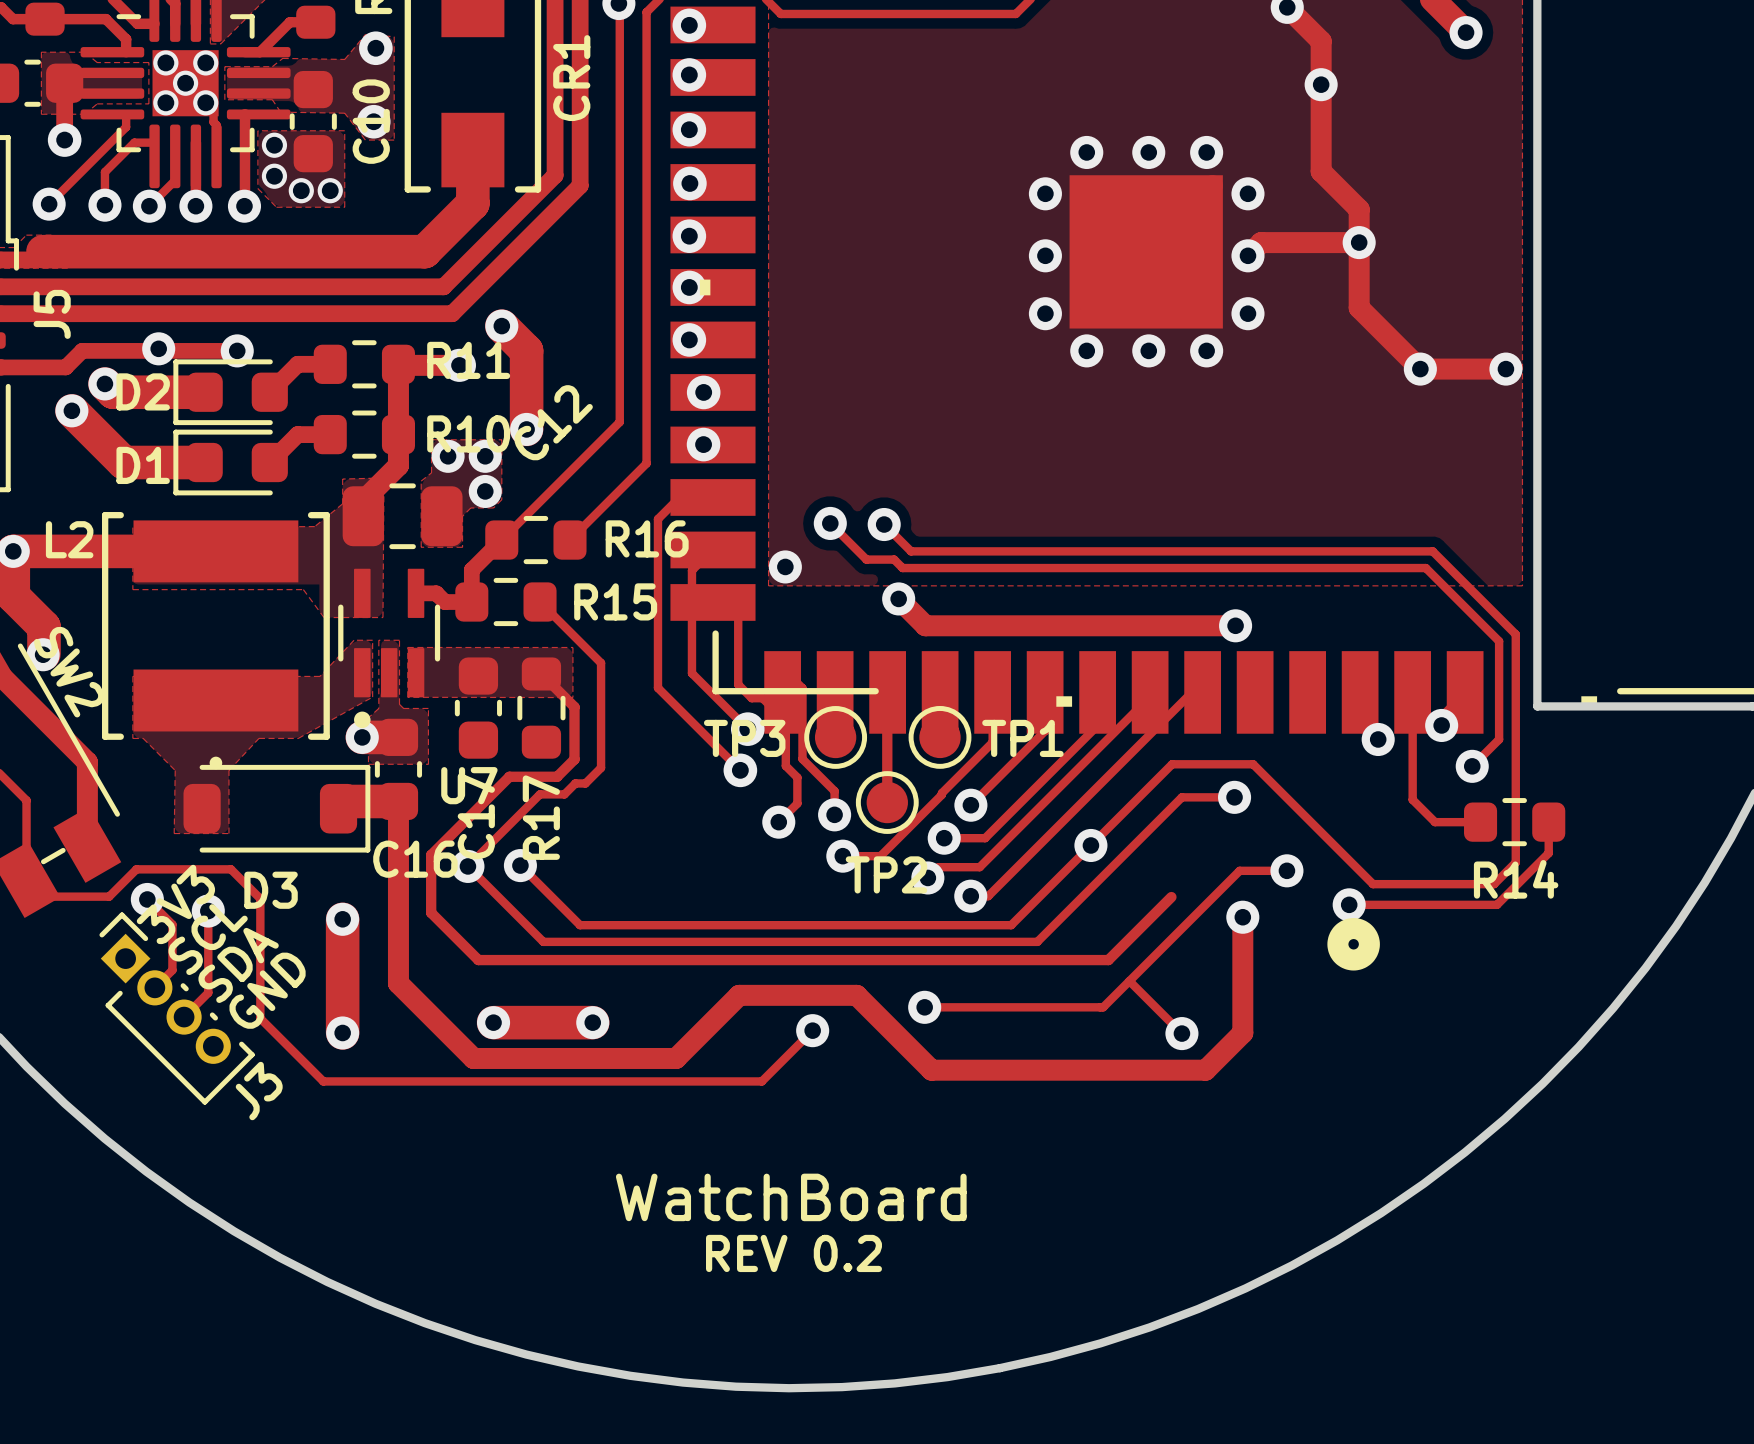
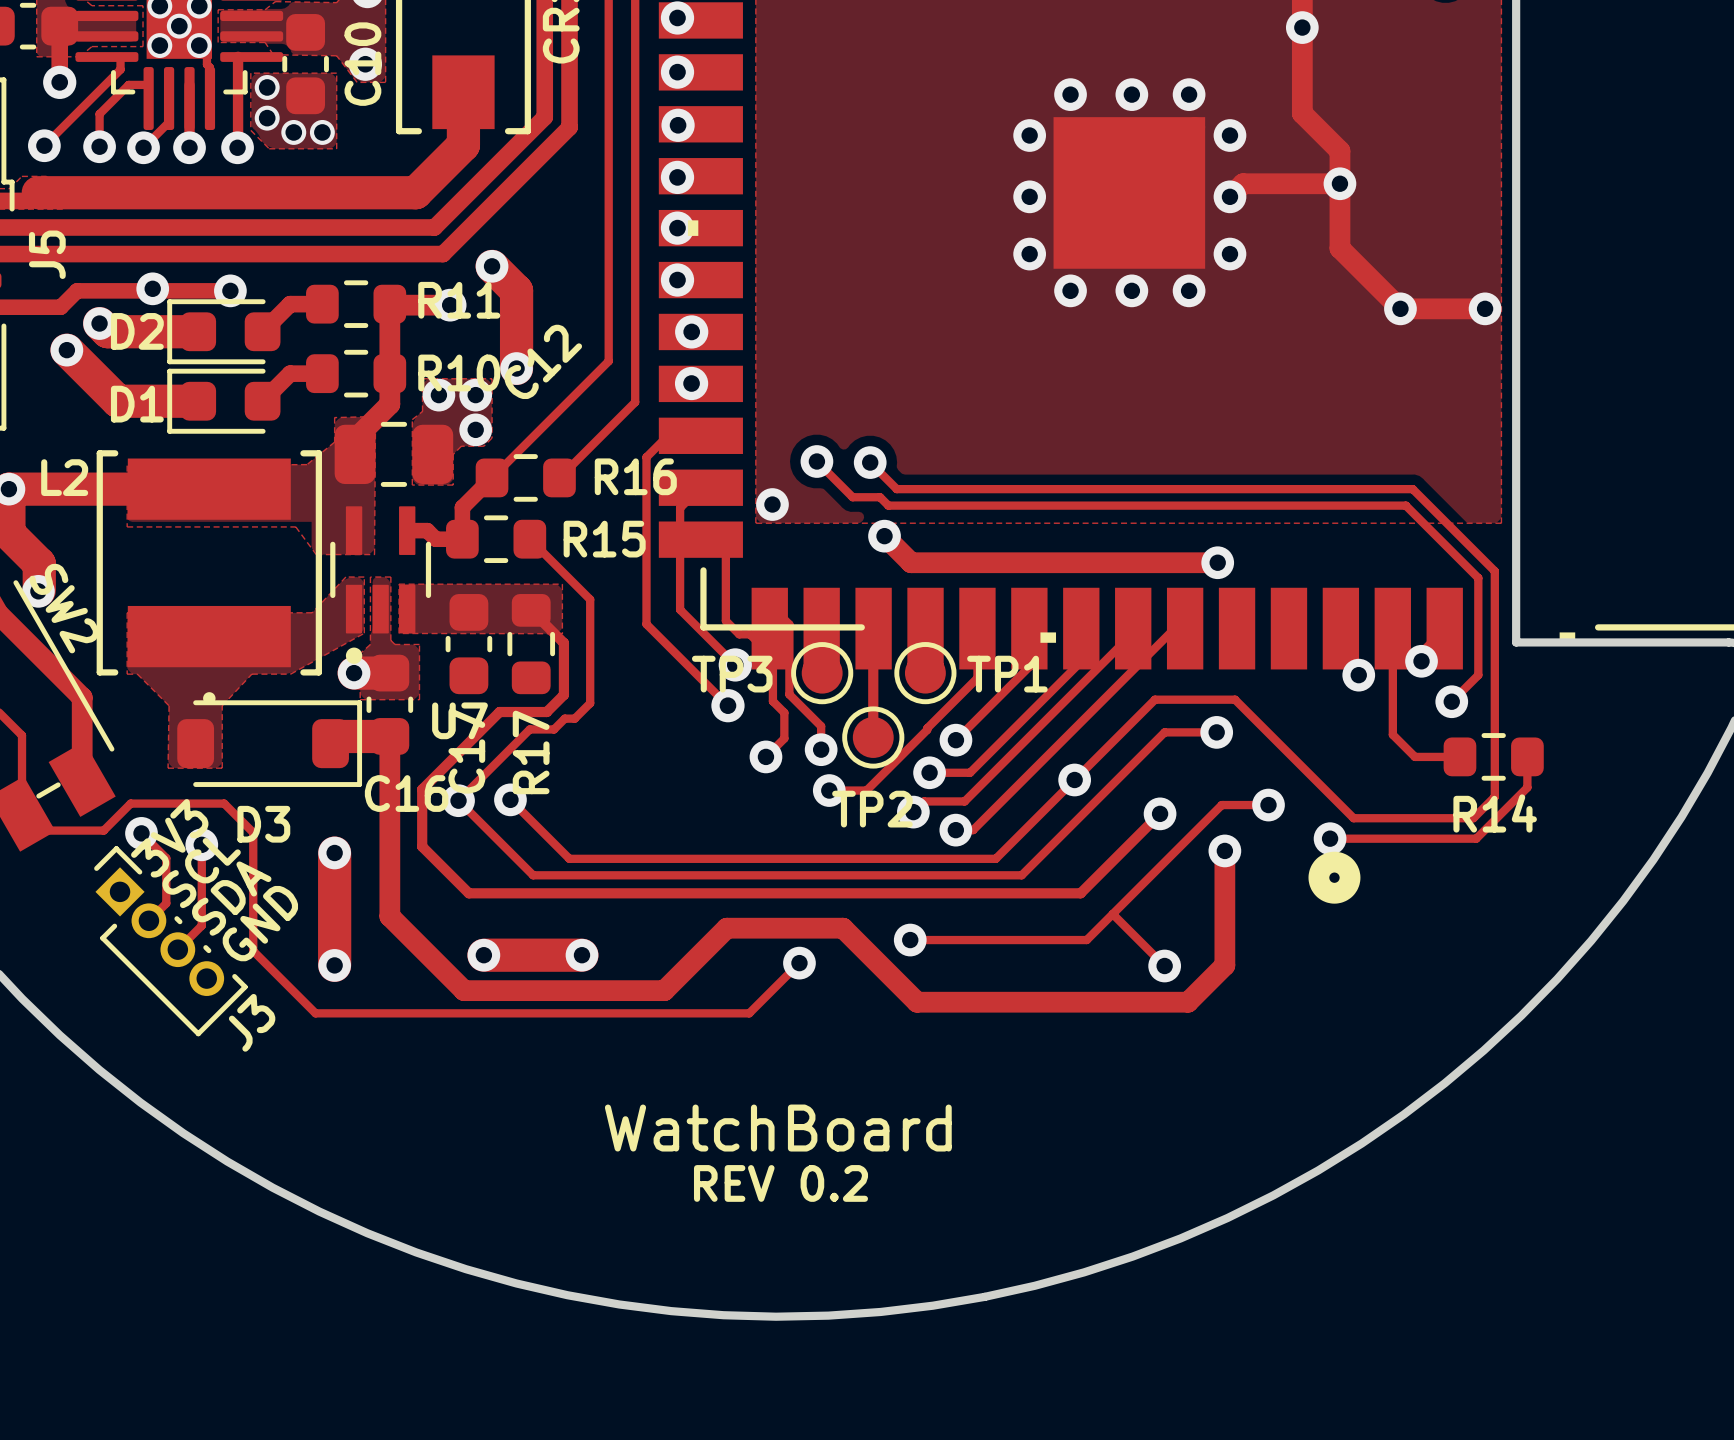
via: none -> (1160, 813)
track: (1171, 897) (1108, 960) (1096, 960) -> (1160, 813) (1080, 893)

